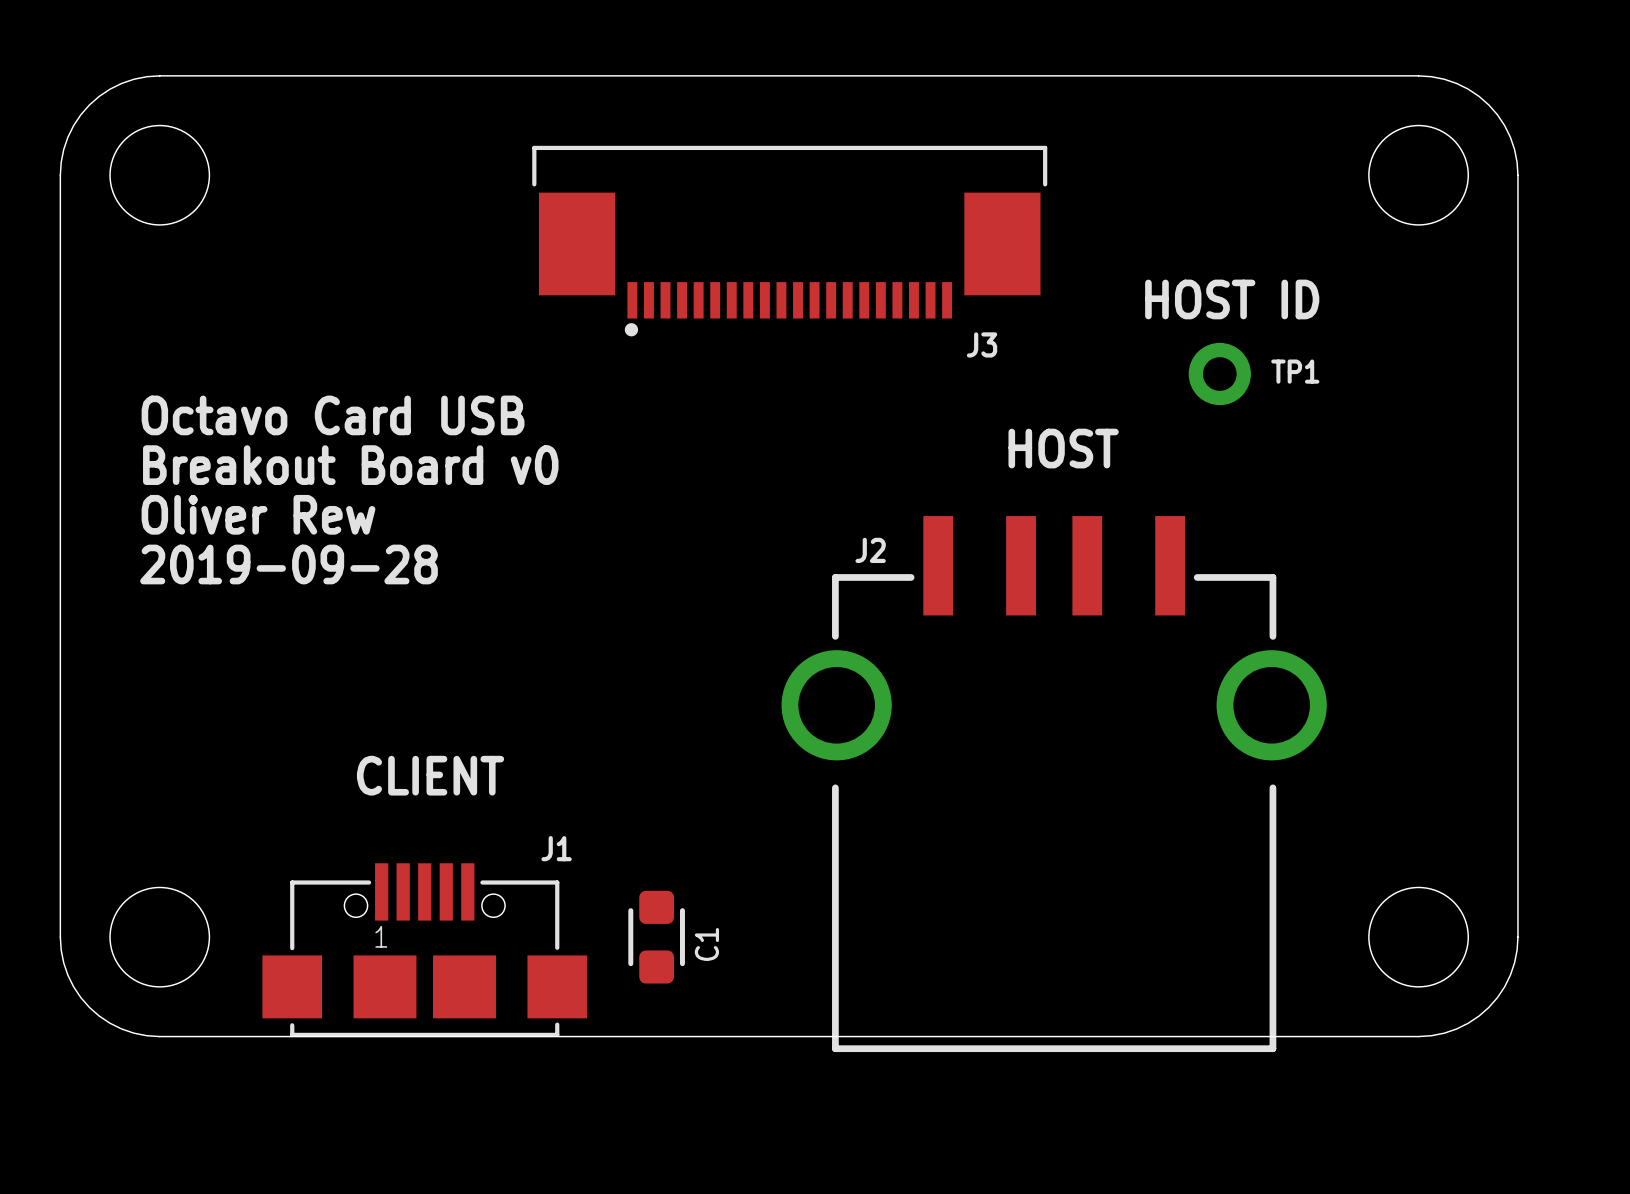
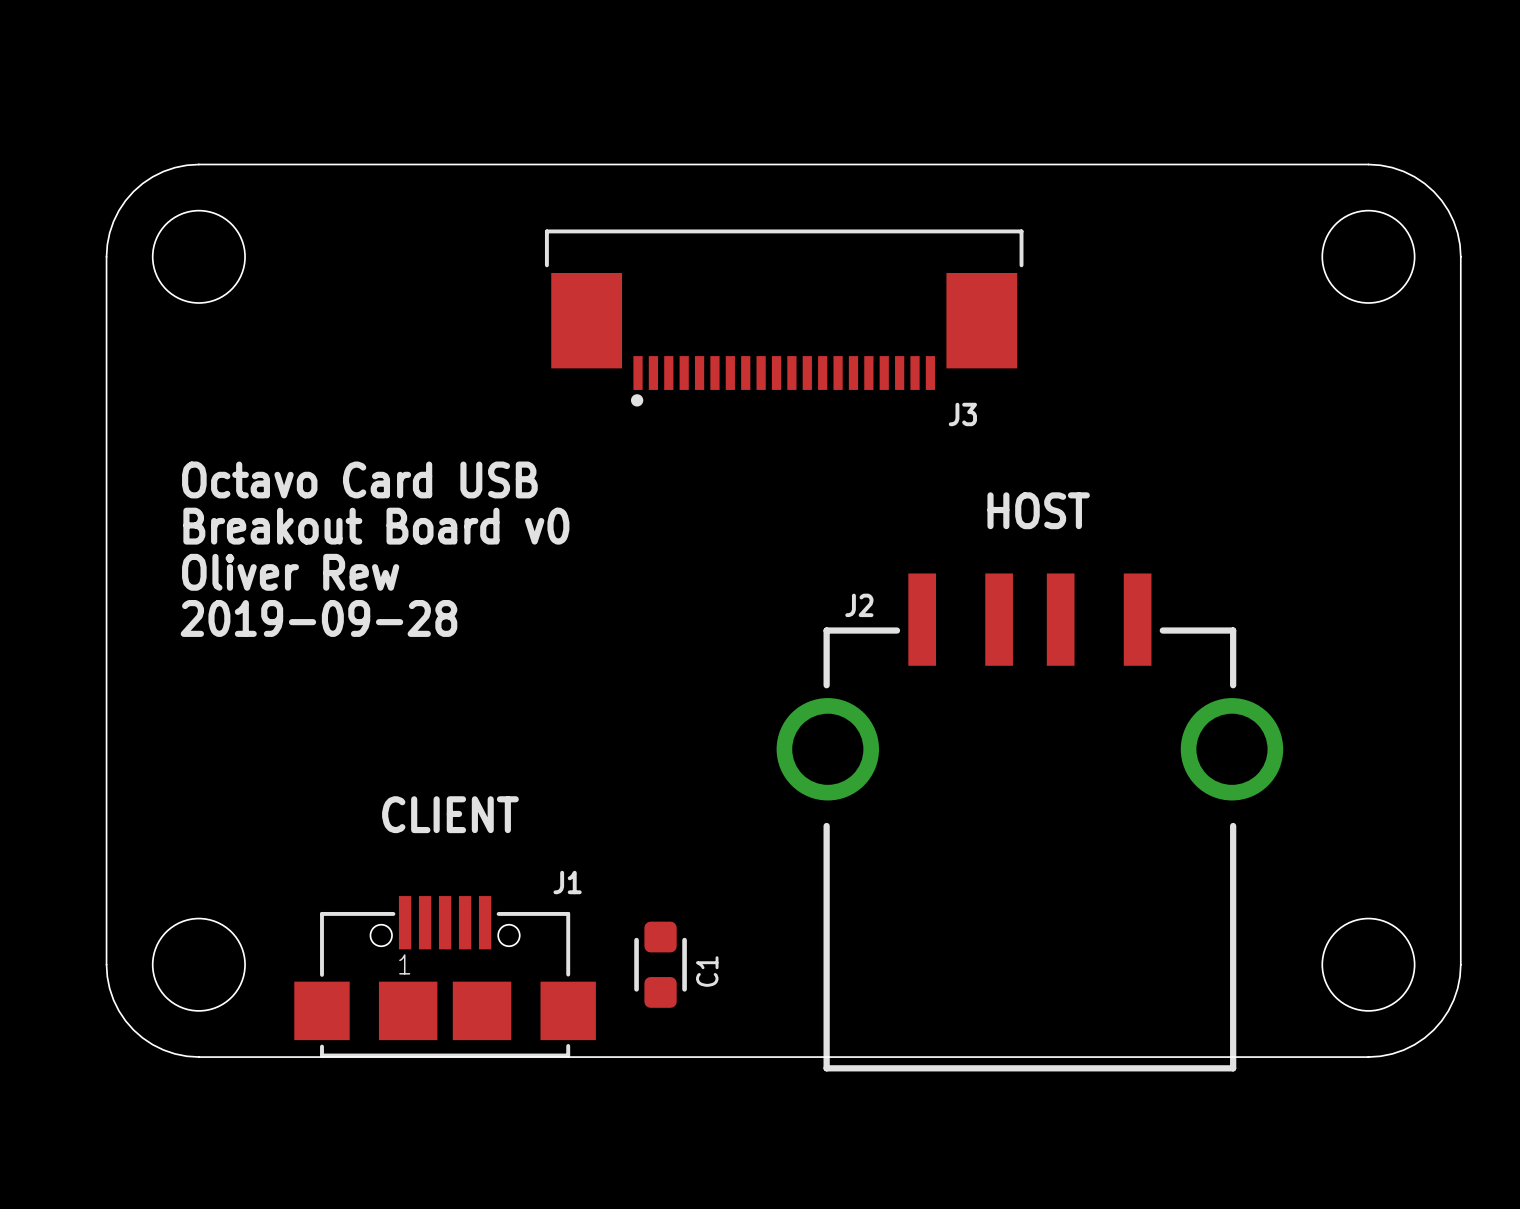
text: HOST ID (1232, 299) -> none
TP1: (1219, 374) -> none

